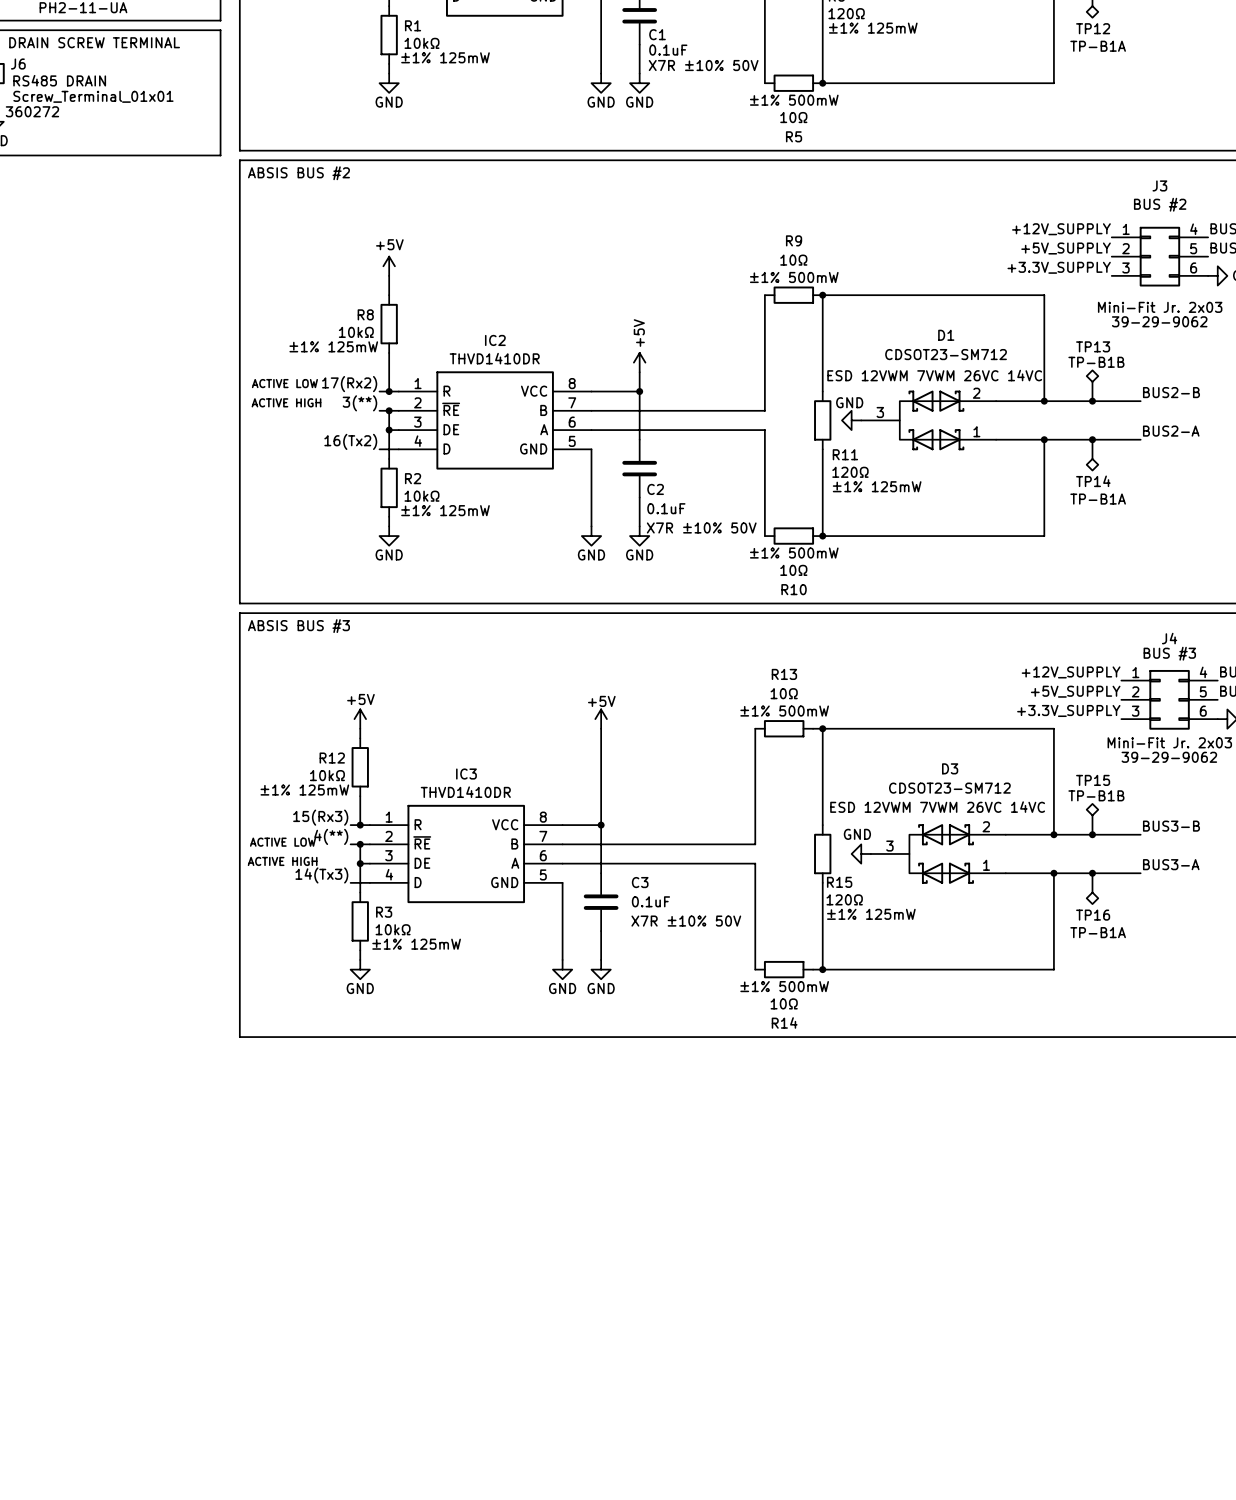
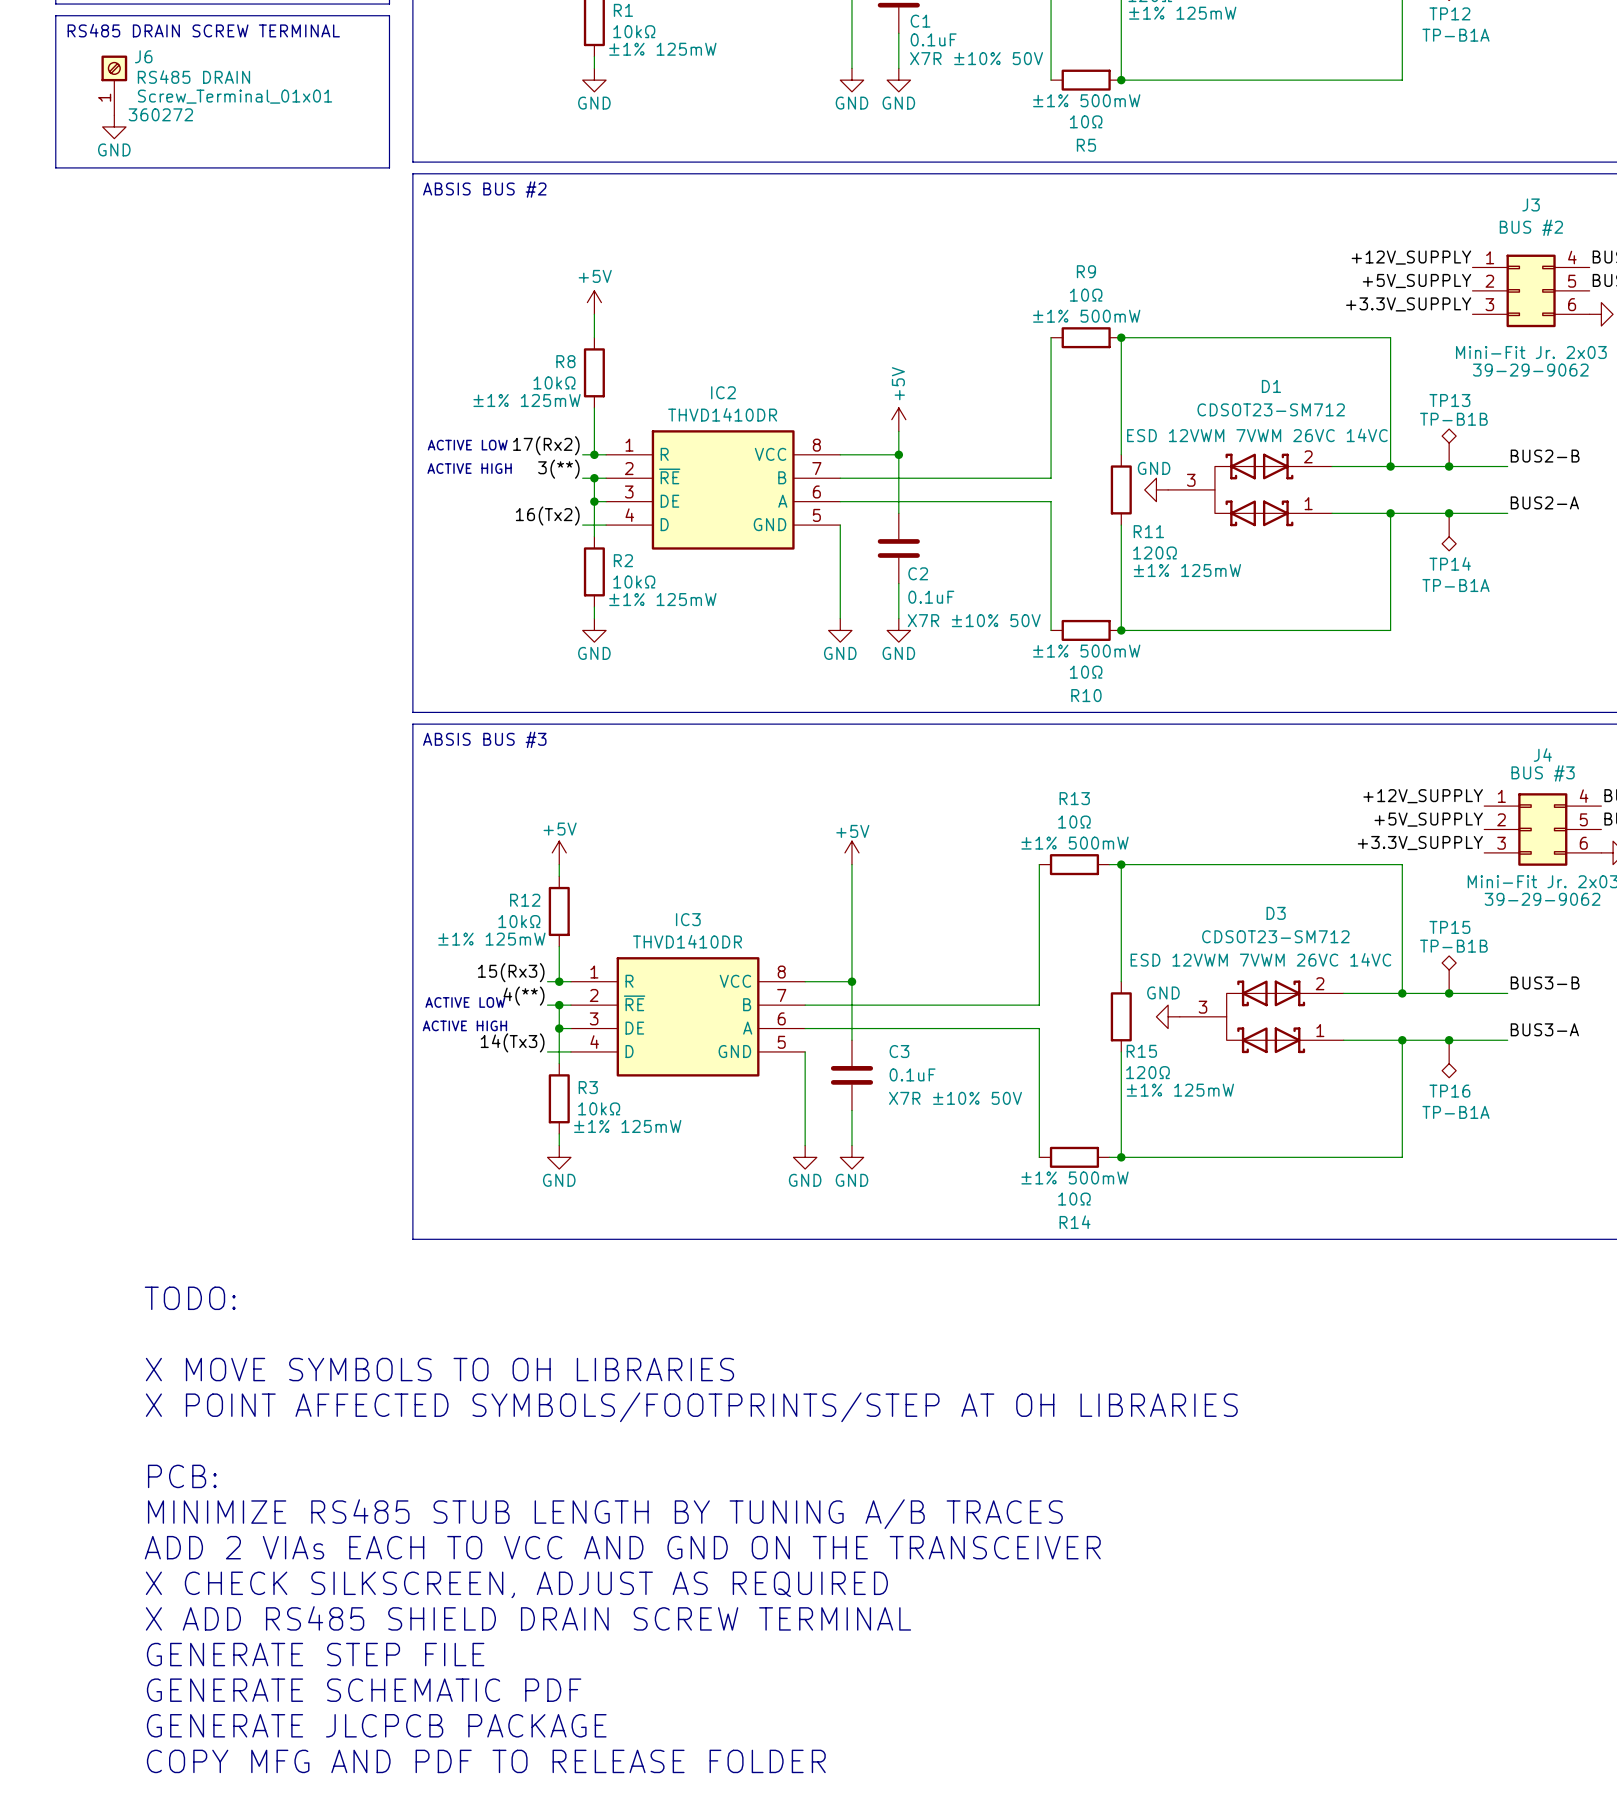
text: none -> TODO: (190, 1298)
text: none -> X MOVE SYMBOLS TO OH LIBRARIES (439, 1369)
text: none -> X POINT AFFECTED SYMBOLS/FOOTPRINTS/STEP AT OH LIBRARIES (691, 1407)
text: none -> PCB: (182, 1476)
text: none -> MINIMIZE RS485 STUB LENGTH BY TUNING A/B TRACES (605, 1514)
text: none -> ADD 2 VIAs EACH TO VCC AND GND ON THE TRANSCEIVER (622, 1547)
text: none -> X CHECK SILKSCREEN, ADJUST AS REQUIRED (516, 1584)
text: none -> X ADD RS485 SHIELD DRAIN SCREW TERMINAL (528, 1618)
text: none -> GENERATE STEP FILE (315, 1654)
text: none -> GENERATE SCHEMATIC PDF (364, 1690)
text: none -> GENERATE JLCPCB PACKAGE (376, 1725)
text: none -> COPY MFG AND PDF TO RELEASE FOLDER (486, 1761)

